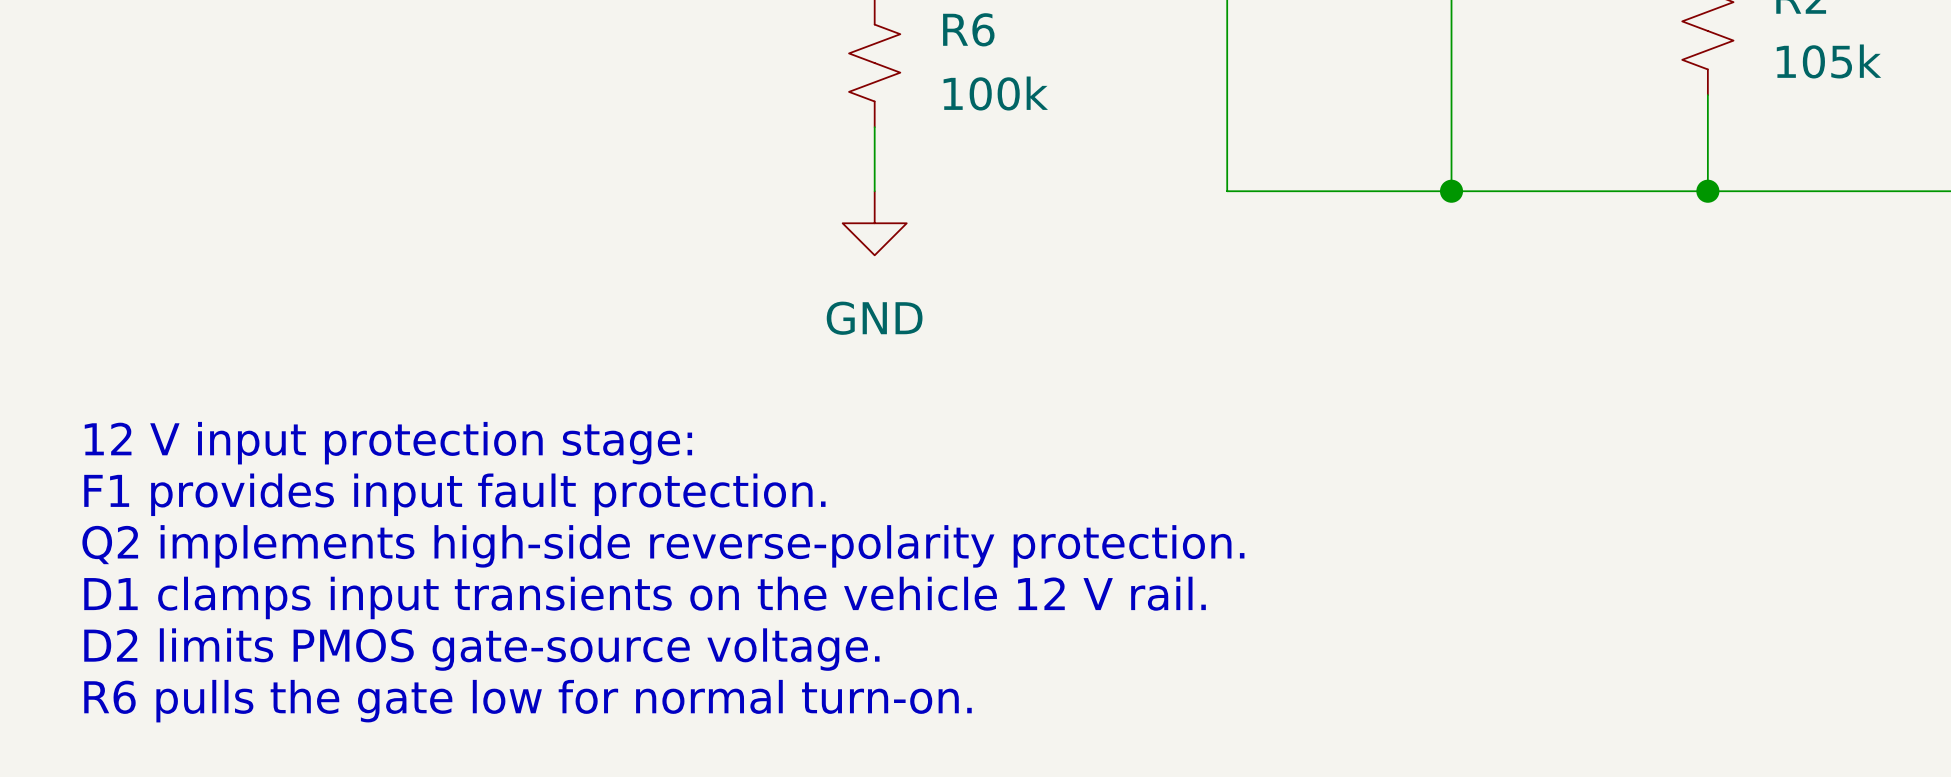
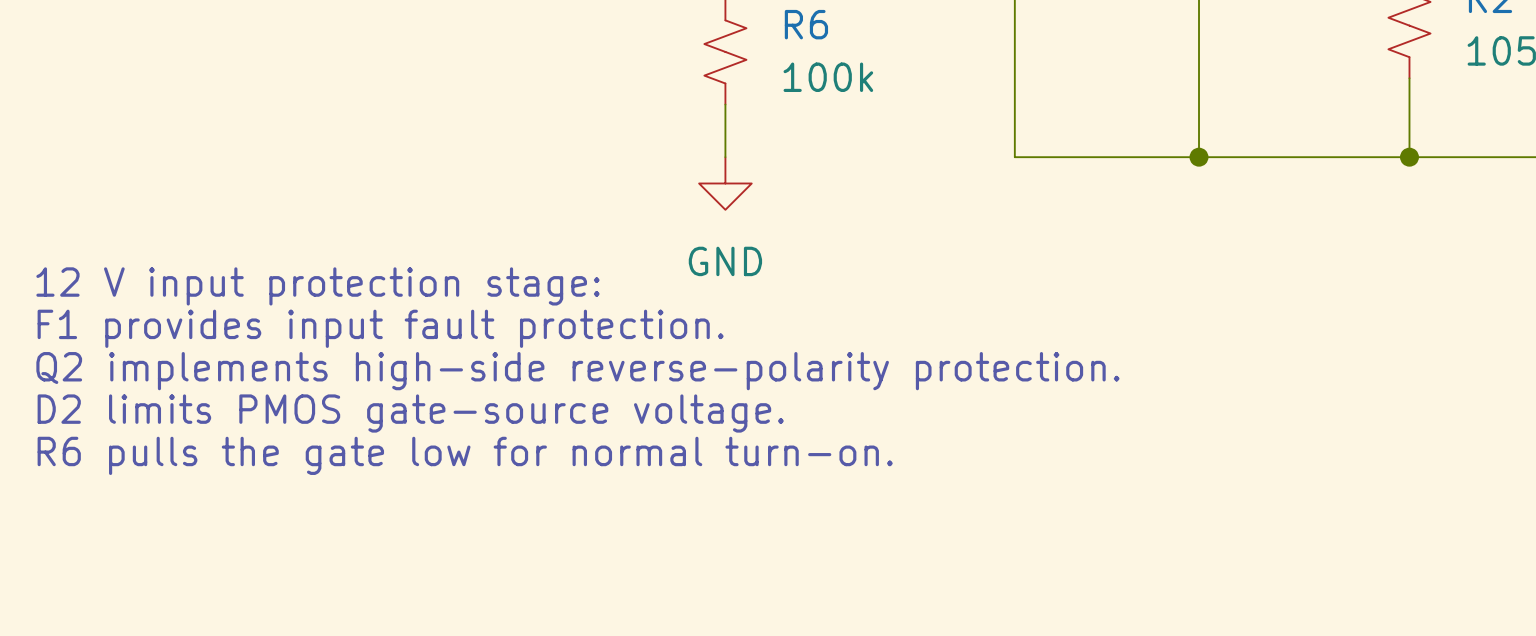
text position: 12 V input protection stage: (388, 443) -> 12 V input protection stage: (317, 286)
text position: F1 provides input fault protection. (454, 494) -> F1 provides input fault protection. (380, 328)
text position: Q2 implements high-side reverse-polarity protection. (663, 546) -> Q2 implements high-side reverse-polarity protection. (577, 371)
text: D1 clamps input transients on the vehicle 12 V rail. (645, 597) -> none
text position: D2 limits PMOS gate-source voltage. (481, 649) -> D2 limits PMOS gate-source voltage. (410, 413)
text position: R6 pulls the gate low for normal turn-on. (527, 701) -> R6 pulls the gate low for normal turn-on. (465, 455)

